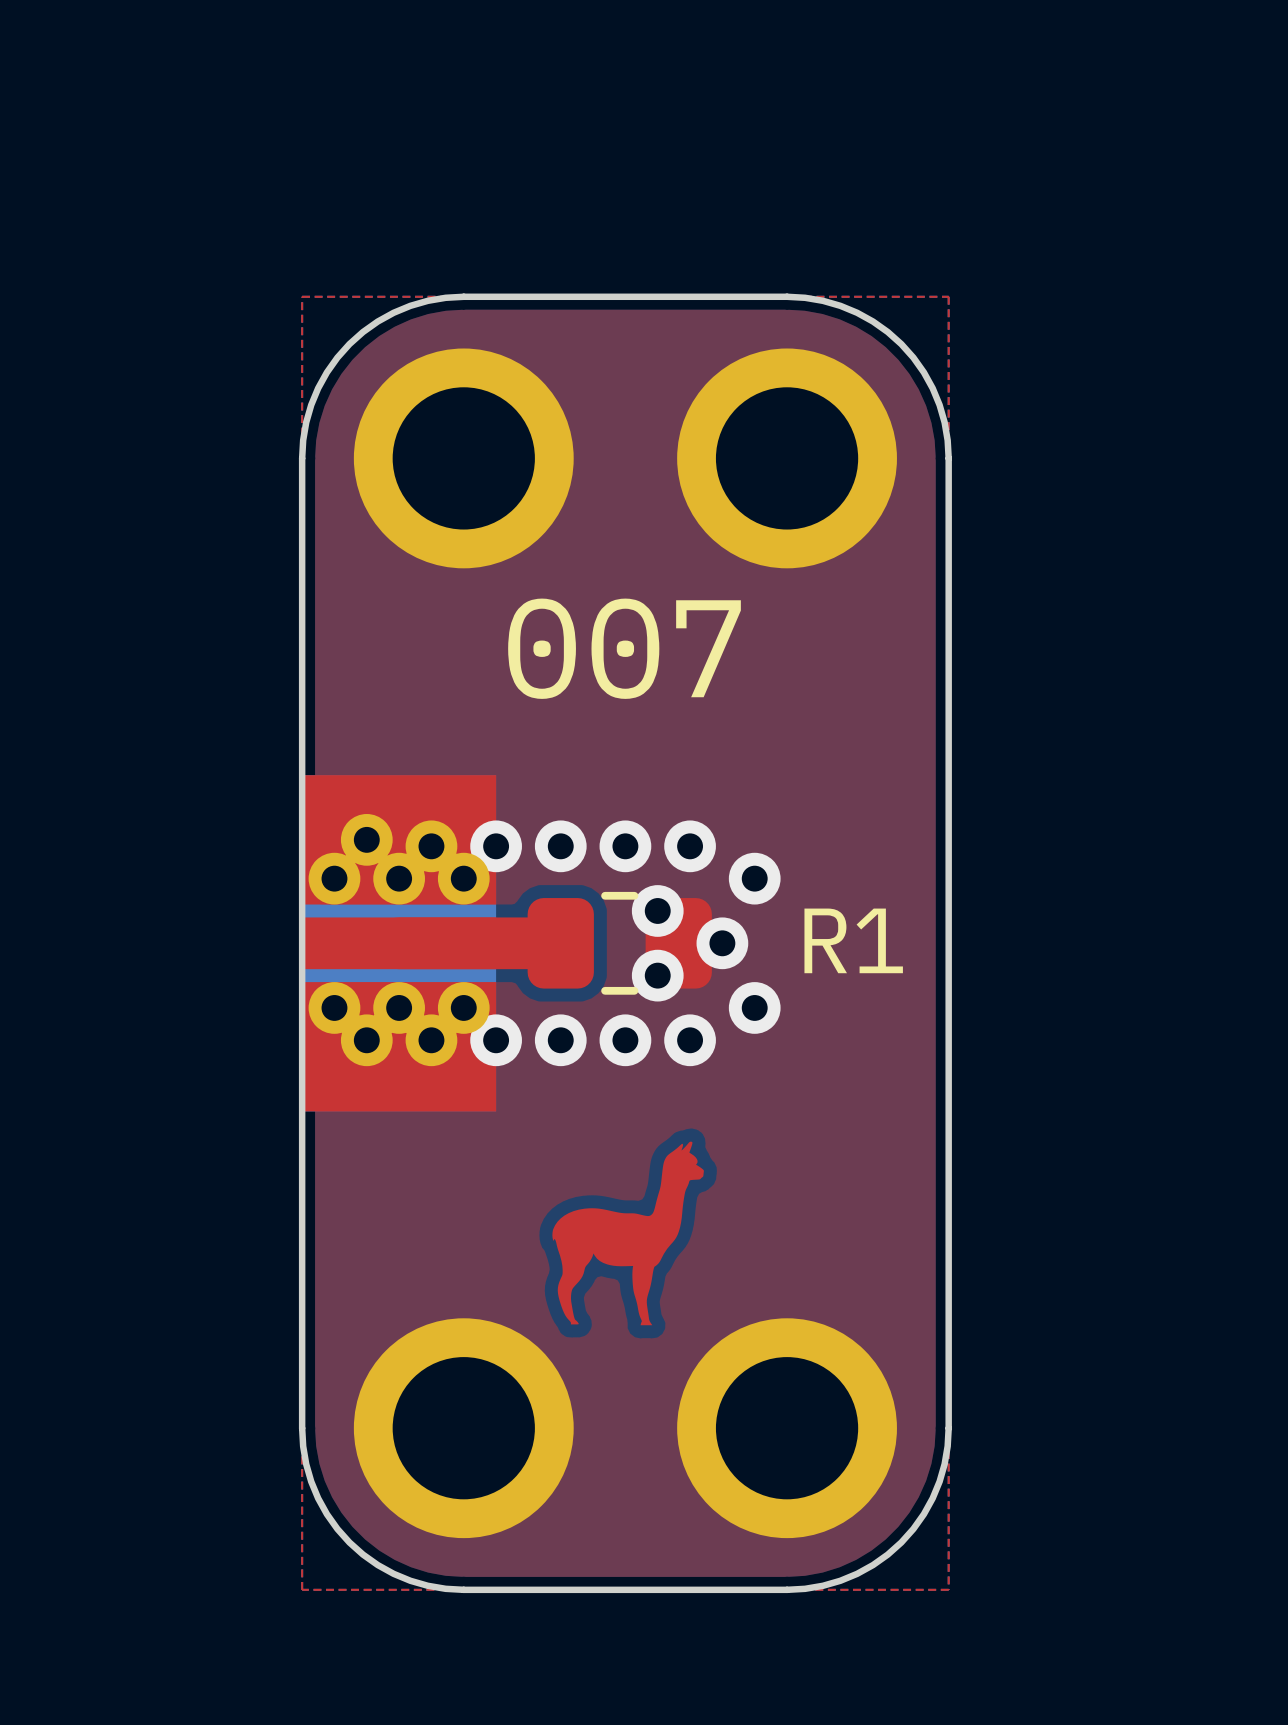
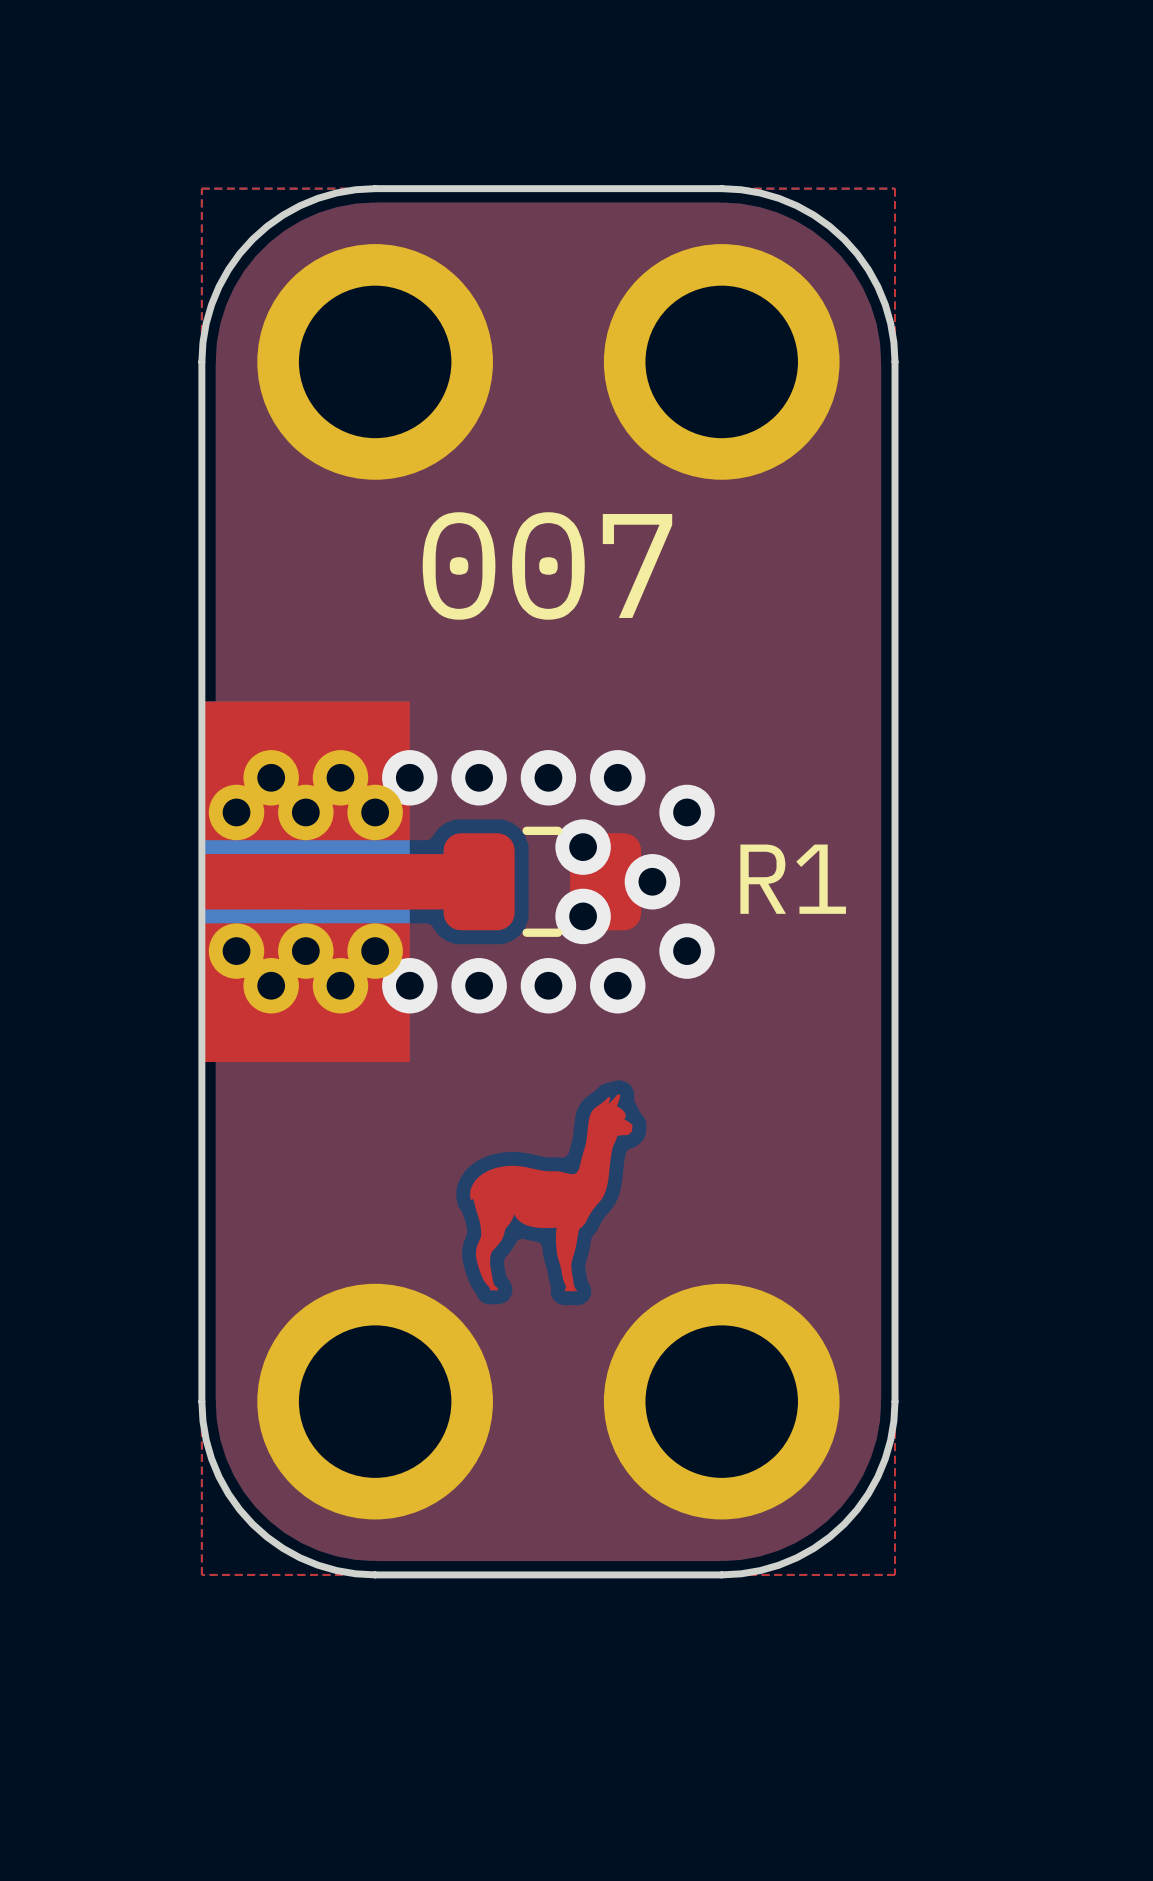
part footprint: [302, 775, 497, 1112] -> [201, 701, 410, 1062]

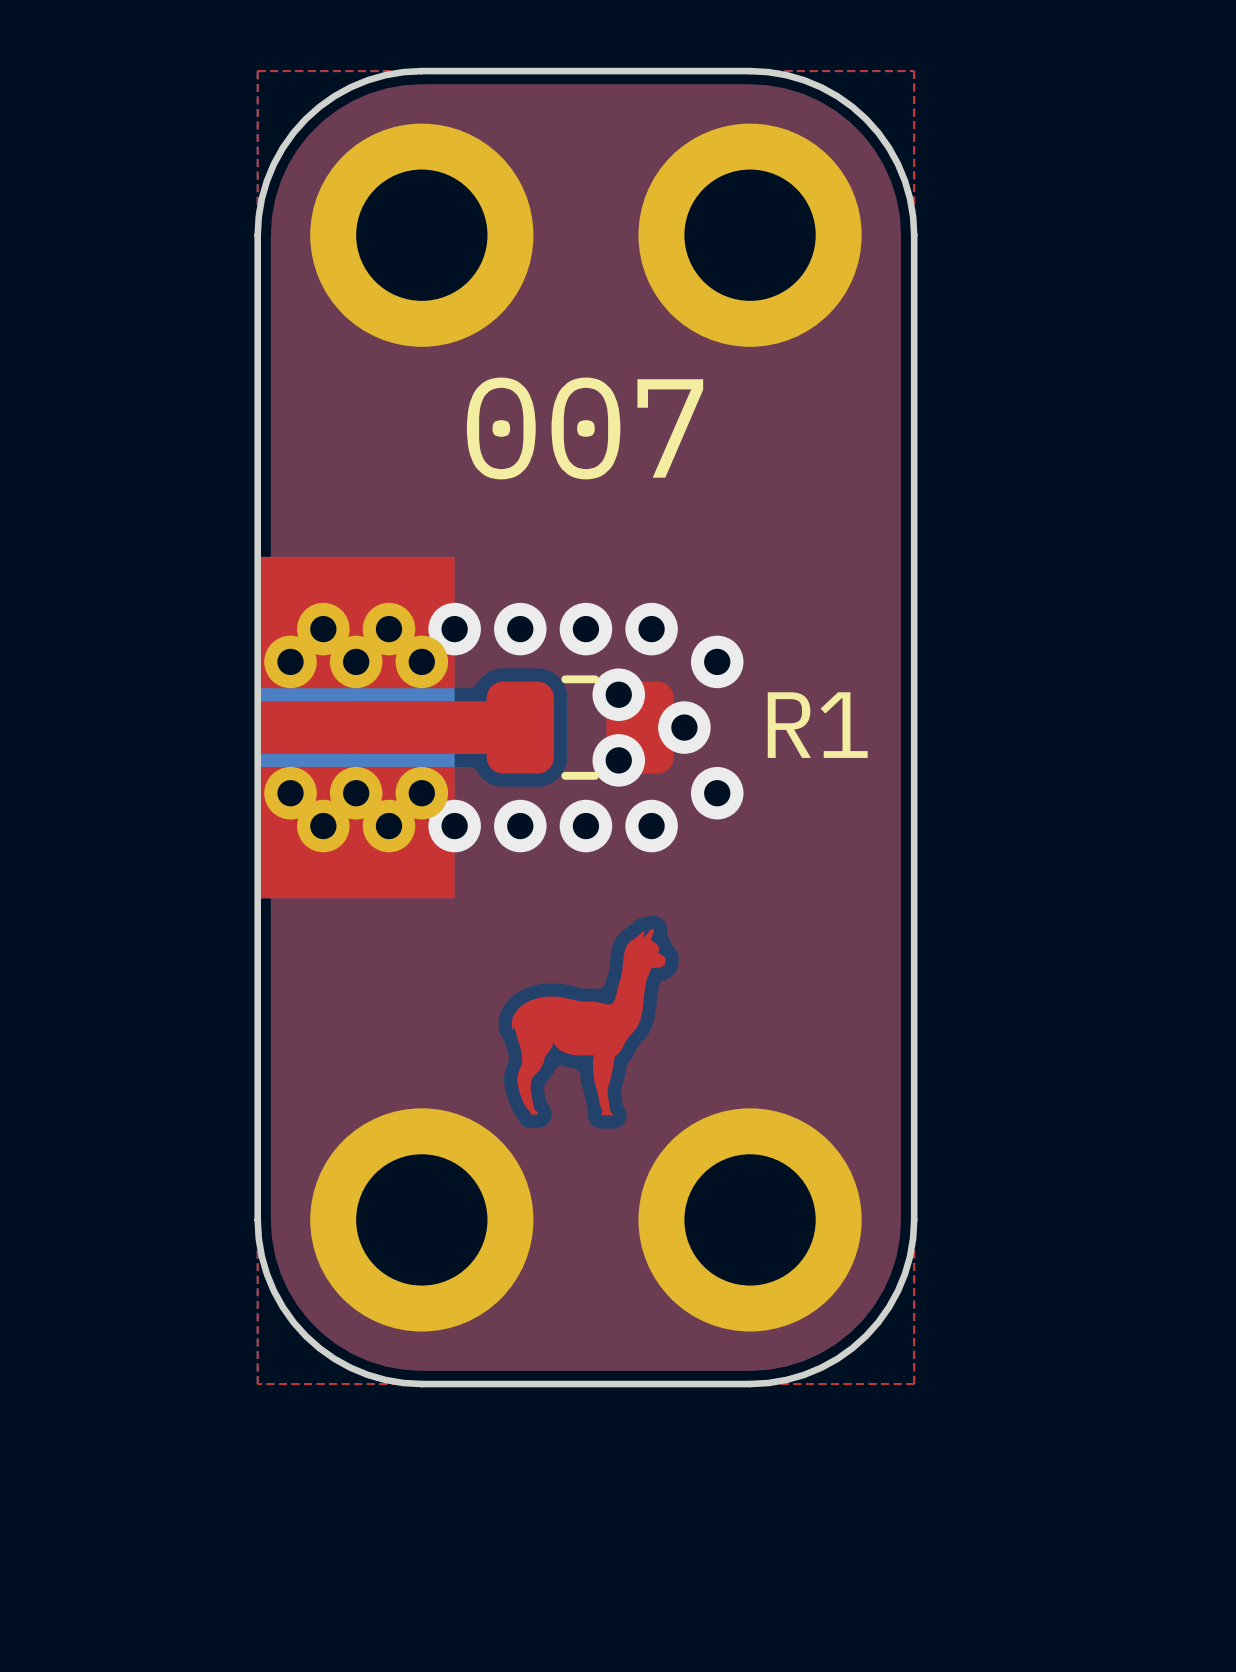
part footprint: [257, 244, 493, 480] -> [310, 123, 534, 347]
part footprint: [603, 244, 840, 480] -> [638, 123, 862, 347]
part footprint: [257, 1283, 493, 1520] -> [310, 1108, 534, 1332]
part footprint: [603, 1283, 840, 1520] -> [638, 1108, 862, 1332]

